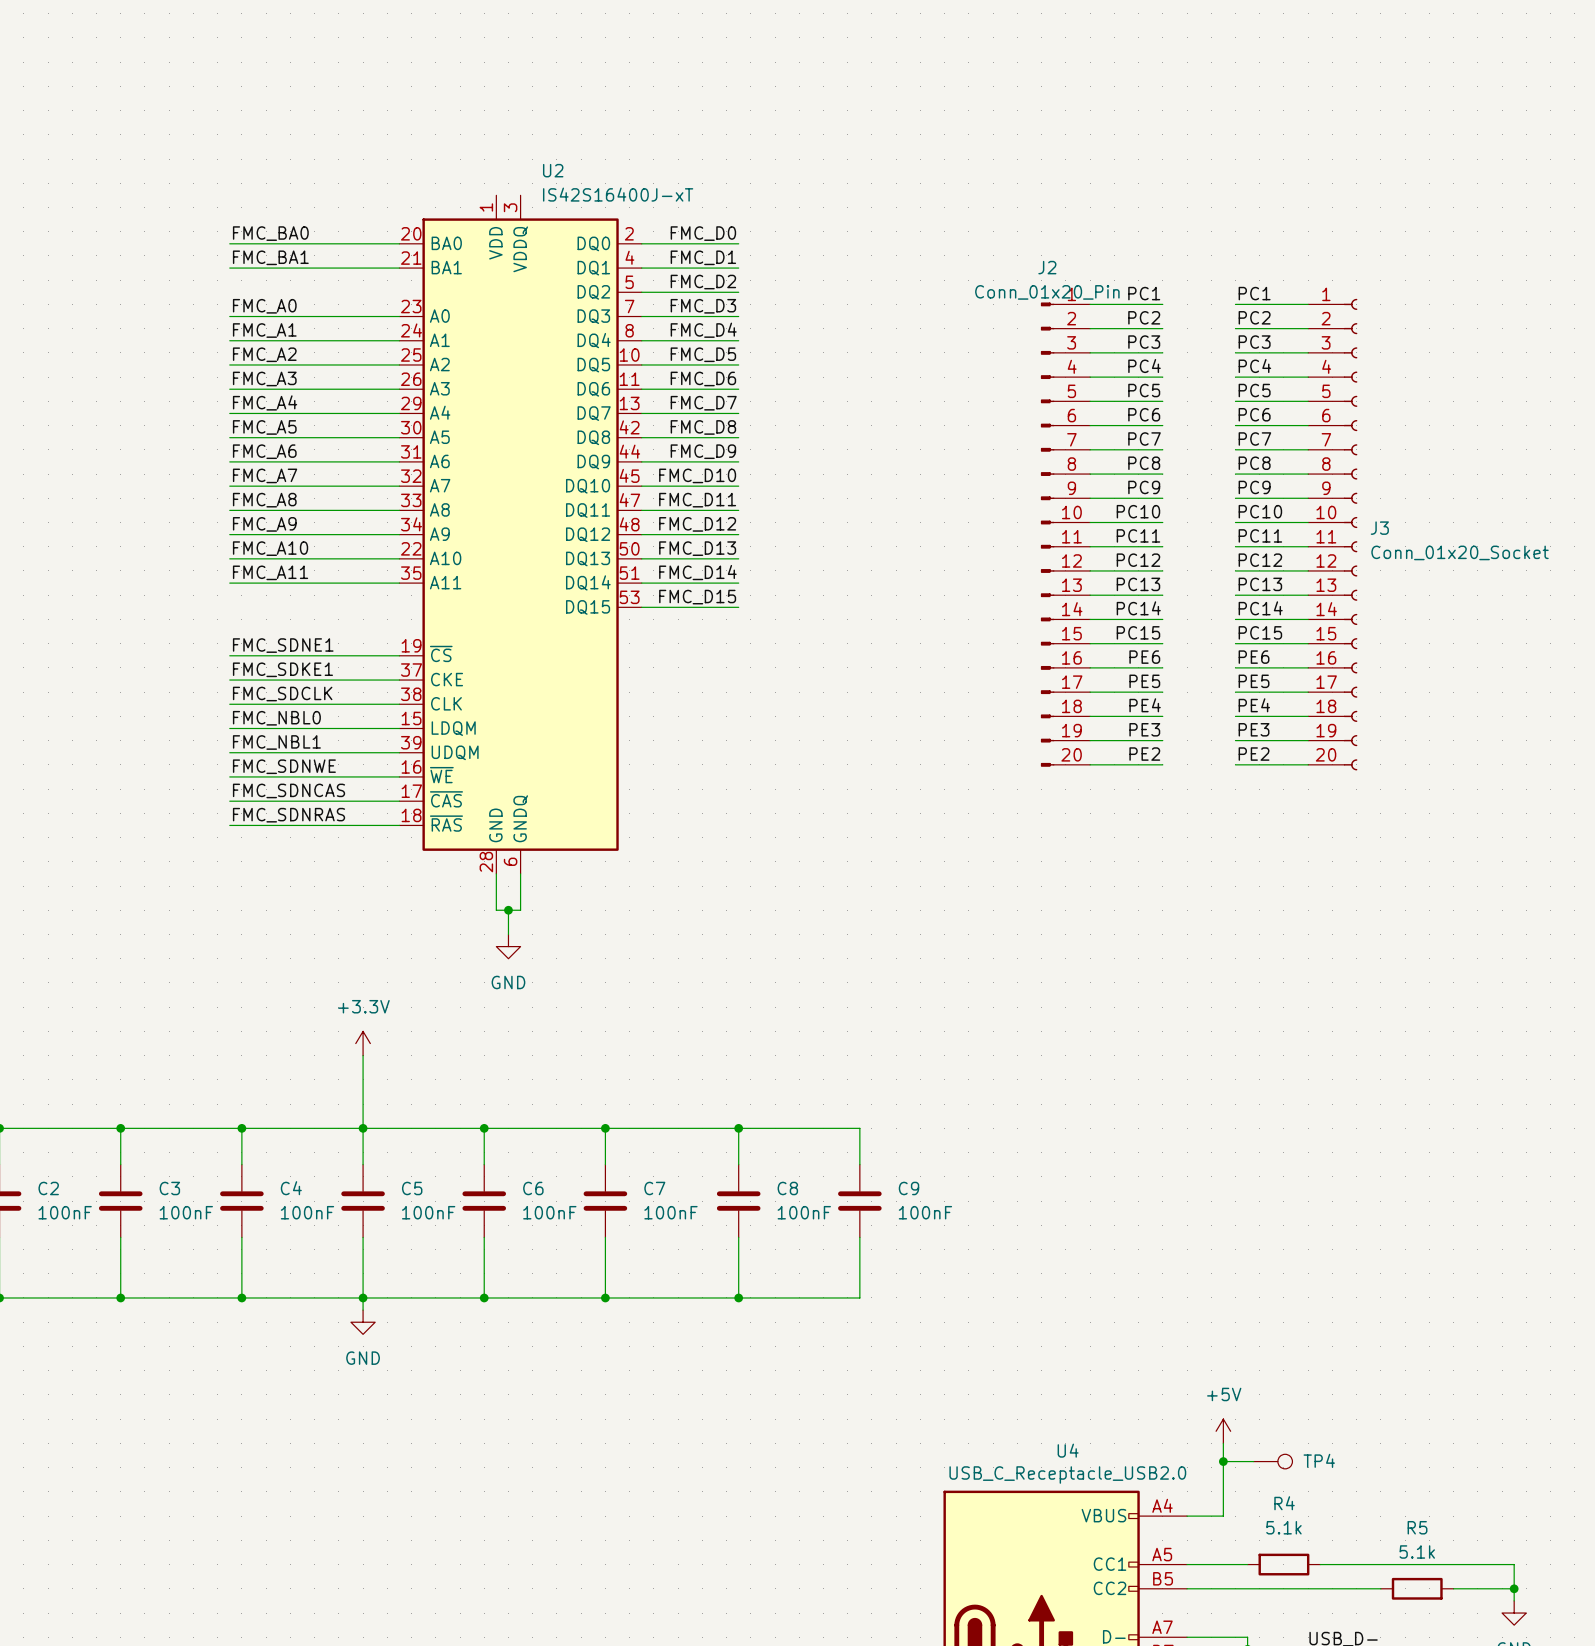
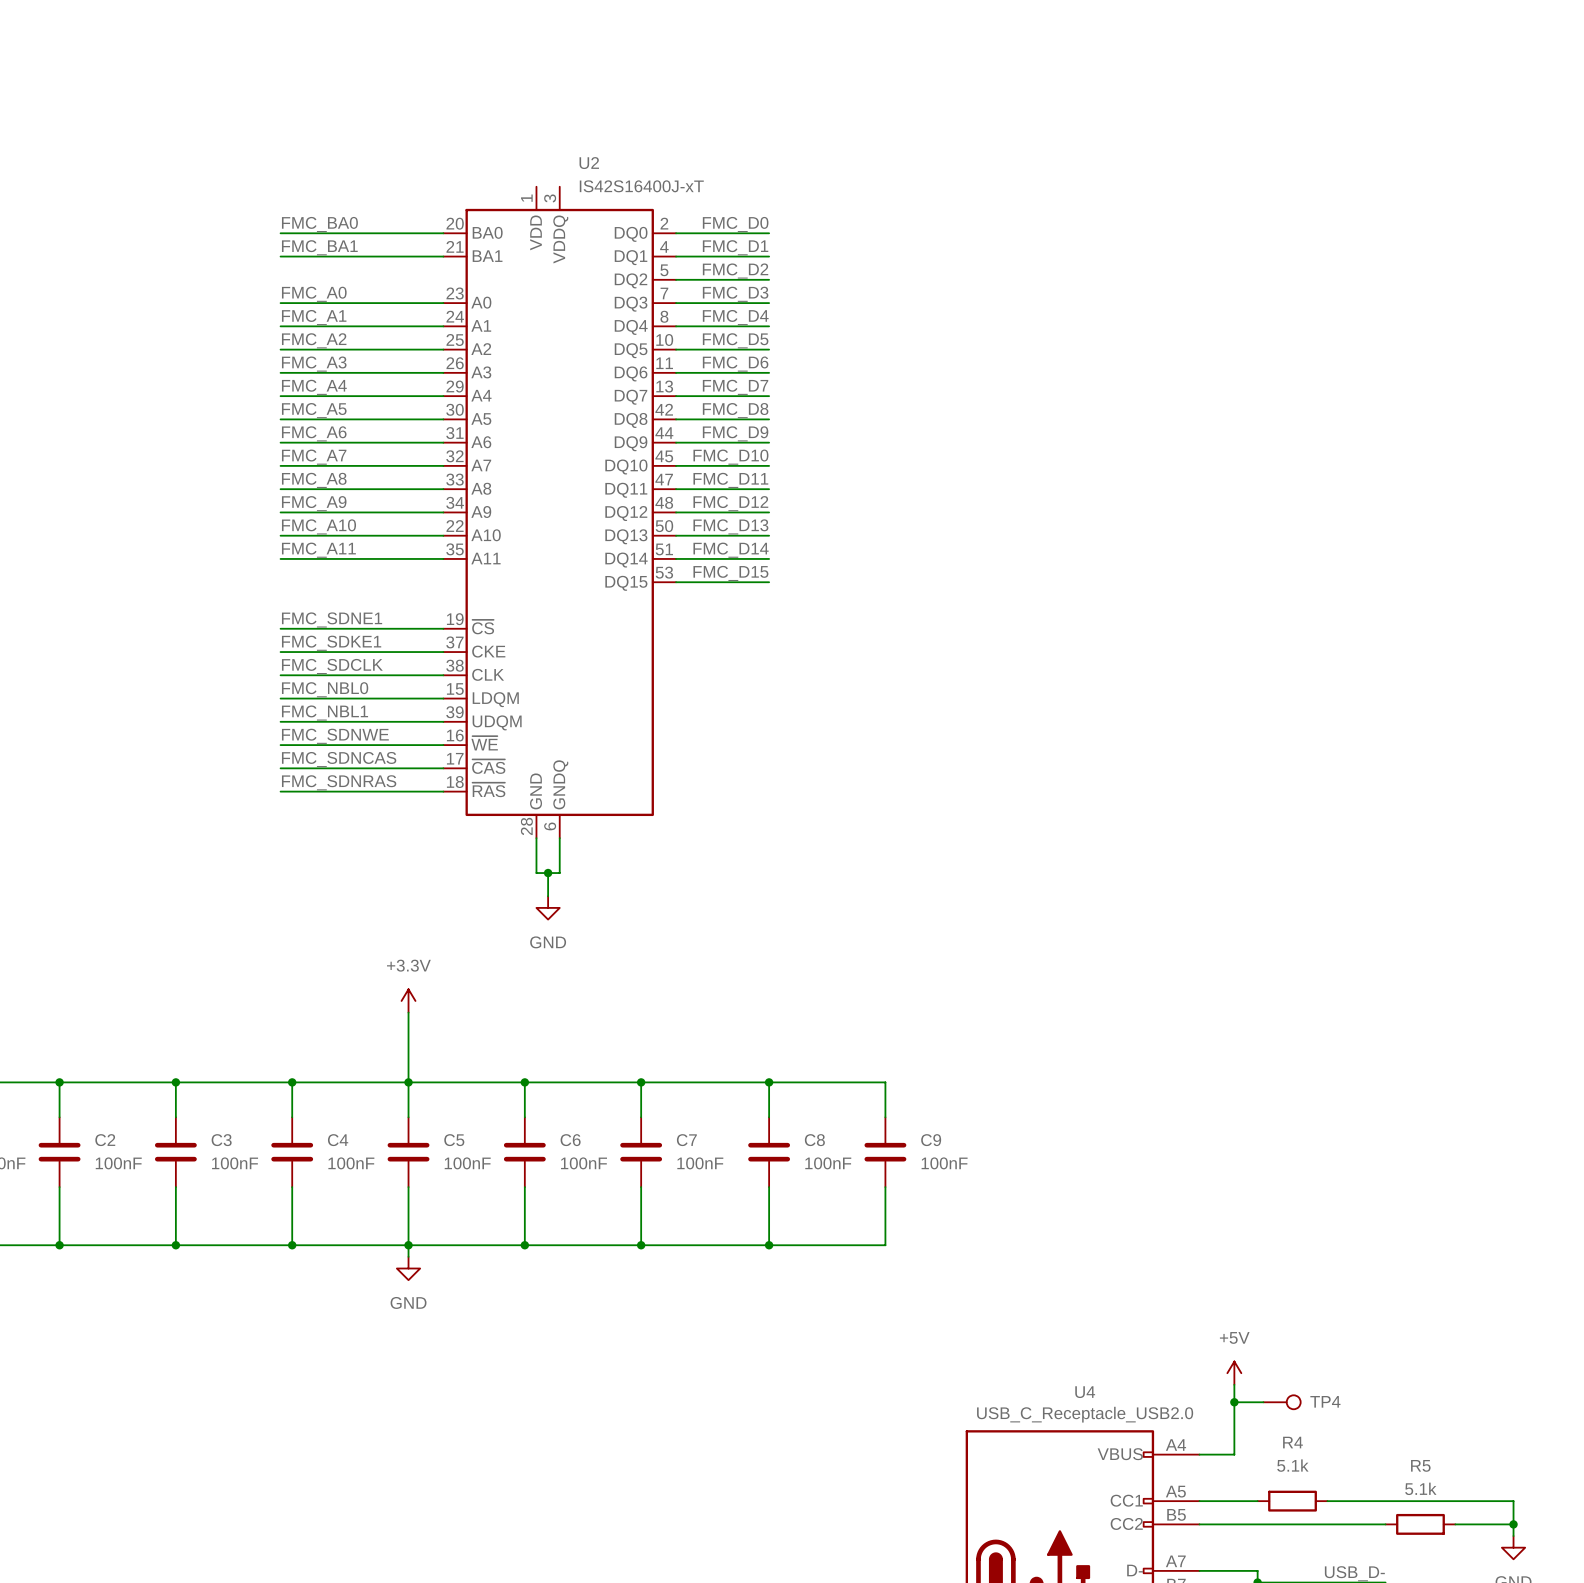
label: PC1 (1144, 293) -> none
label: PC1 (1254, 293) -> none
wire: (1090, 304) (1162, 304) -> none
wire: (1235, 304) (1308, 304) -> none
label: PC2 (1144, 317) -> none
label: PC2 (1254, 317) -> none
wire: (1090, 328) (1162, 328) -> none
wire: (1235, 328) (1308, 328) -> none
label: PC3 (1144, 342) -> none
label: PC3 (1254, 342) -> none
wire: (1090, 352) (1162, 352) -> none
wire: (1235, 352) (1308, 352) -> none
label: PC4 (1144, 366) -> none
label: PC4 (1254, 366) -> none
wire: (1090, 377) (1162, 377) -> none
wire: (1235, 377) (1308, 377) -> none
label: PC5 (1144, 390) -> none
label: PC5 (1254, 390) -> none
wire: (1090, 401) (1162, 401) -> none
wire: (1235, 401) (1308, 401) -> none
label: PC6 (1144, 414) -> none
label: PC6 (1254, 414) -> none
wire: (1090, 425) (1162, 425) -> none
wire: (1235, 425) (1308, 425) -> none
label: PC7 (1144, 438) -> none
label: PC7 (1254, 438) -> none
wire: (1090, 449) (1162, 449) -> none
wire: (1235, 449) (1308, 449) -> none
label: PC8 (1144, 463) -> none
label: PC8 (1254, 463) -> none
wire: (1090, 474) (1162, 474) -> none
wire: (1235, 474) (1308, 474) -> none
label: PC9 (1144, 487) -> none
label: PC9 (1254, 487) -> none
wire: (1090, 498) (1162, 498) -> none
wire: (1235, 498) (1308, 498) -> none
label: PC10 (1138, 511) -> none
label: PC10 (1260, 511) -> none
wire: (1090, 522) (1162, 522) -> none
wire: (1235, 522) (1308, 522) -> none
J2: Conn_01x20_Pin (1065, 534) -> none
J3: Conn_01x20_Socket (1332, 534) -> none
label: PC11 (1138, 535) -> none
label: PC11 (1260, 535) -> none
wire: (1090, 546) (1162, 546) -> none
wire: (1235, 546) (1308, 546) -> none
label: PC12 (1138, 560) -> none
label: PC12 (1260, 560) -> none
wire: (1090, 570) (1162, 570) -> none
wire: (1235, 570) (1308, 570) -> none
label: PC13 (1138, 584) -> none
label: PC13 (1260, 584) -> none
wire: (1090, 595) (1162, 595) -> none
wire: (1235, 595) (1308, 595) -> none
label: PC14 (1138, 608) -> none
label: PC14 (1260, 608) -> none
wire: (1090, 619) (1162, 619) -> none
wire: (1235, 619) (1308, 619) -> none
label: PC15 (1138, 632) -> none
label: PC15 (1260, 632) -> none
wire: (1090, 643) (1162, 643) -> none
wire: (1235, 643) (1308, 643) -> none
label: PE6 (1144, 657) -> none
label: PE6 (1254, 657) -> none
wire: (1090, 667) (1162, 667) -> none
wire: (1235, 667) (1308, 667) -> none
label: PE5 (1144, 681) -> none
label: PE5 (1254, 681) -> none
wire: (1090, 692) (1162, 692) -> none
wire: (1235, 692) (1308, 692) -> none
label: PE4 (1145, 705) -> none
label: PE4 (1254, 705) -> none
wire: (1090, 716) (1162, 716) -> none
wire: (1235, 716) (1308, 716) -> none
label: PE3 (1144, 729) -> none
label: PE3 (1254, 729) -> none
wire: (1090, 740) (1162, 740) -> none
wire: (1235, 740) (1308, 740) -> none
label: PE2 (1144, 754) -> none
label: PE2 (1254, 754) -> none
wire: (1090, 764) (1162, 764) -> none
wire: (1235, 764) (1308, 764) -> none

